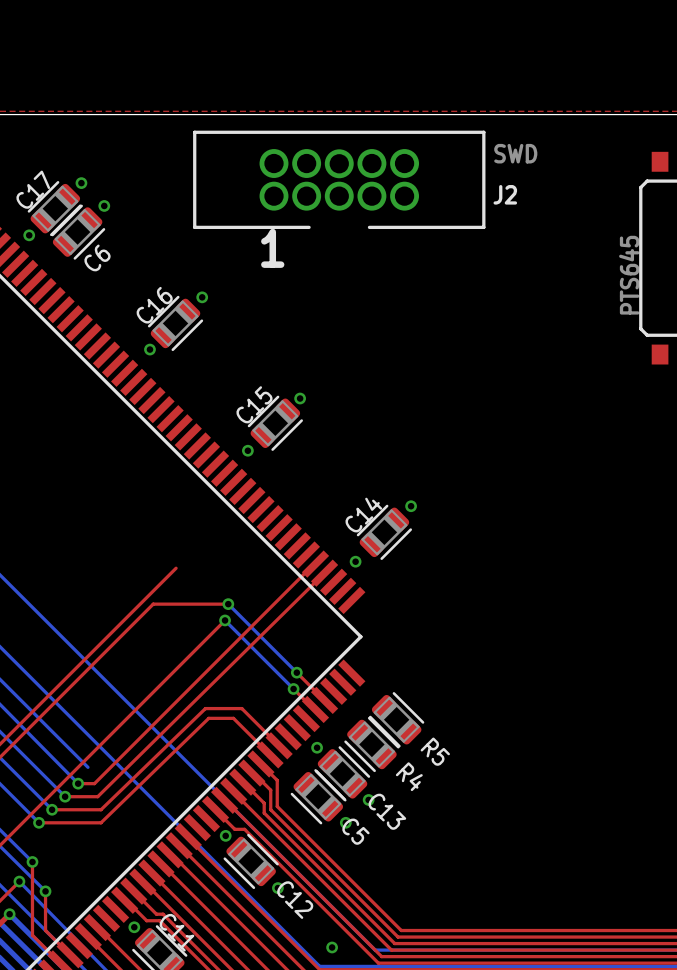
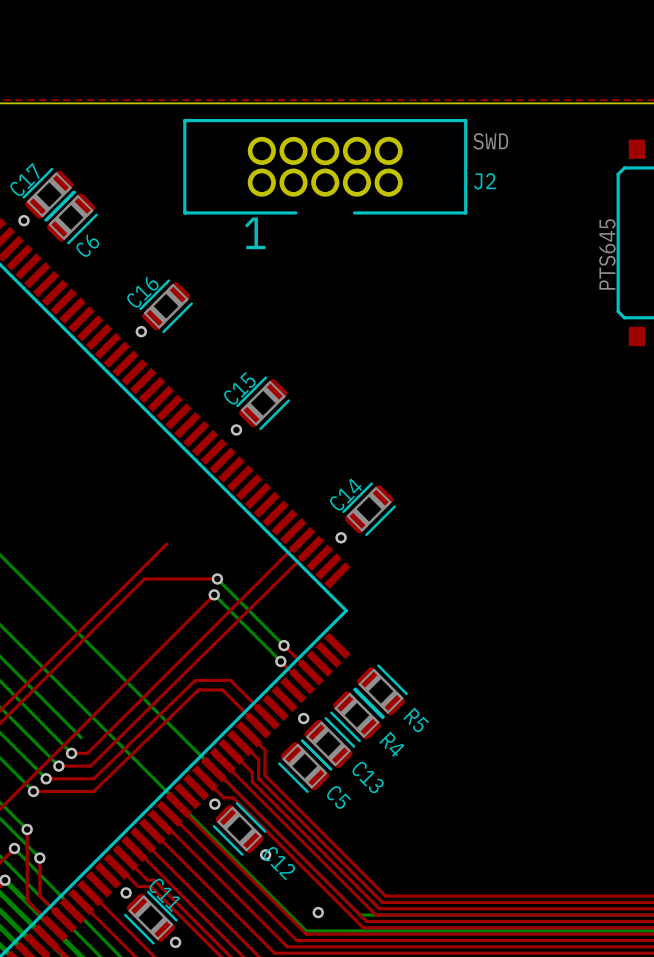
via: (81, 183) -> none
via: (104, 205) -> none
via: (202, 297) -> none
via: (300, 398) -> none
via: (411, 506) -> none
via: (368, 799) -> none
via: (345, 822) -> none

